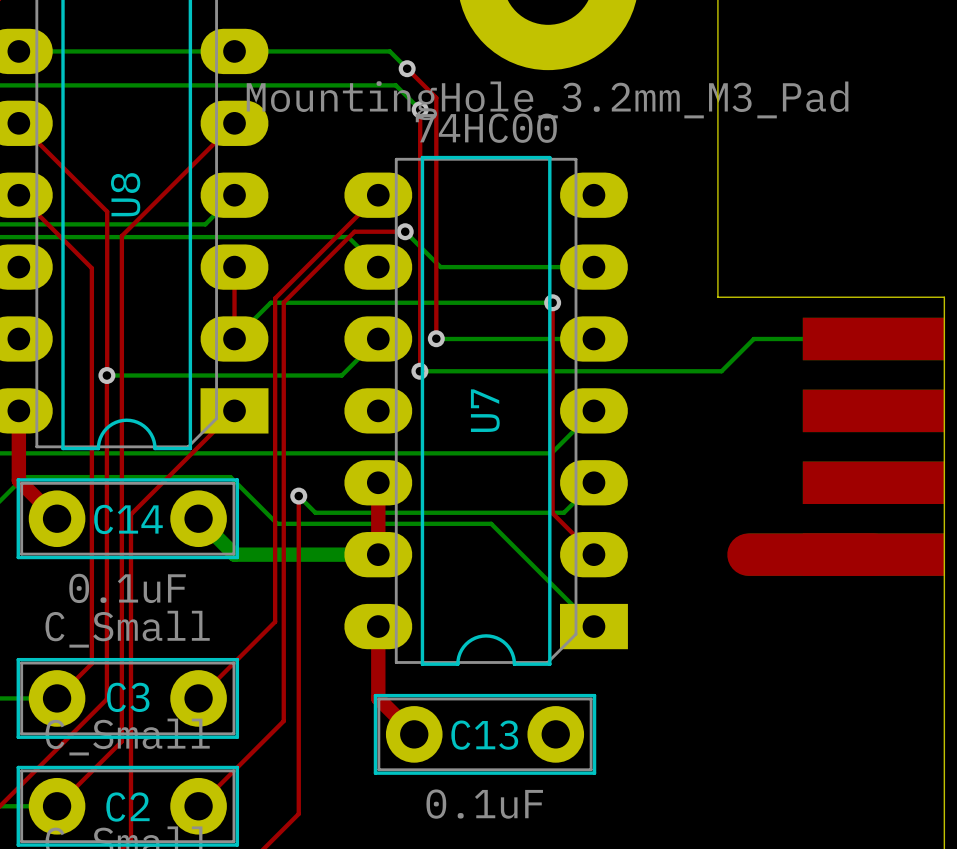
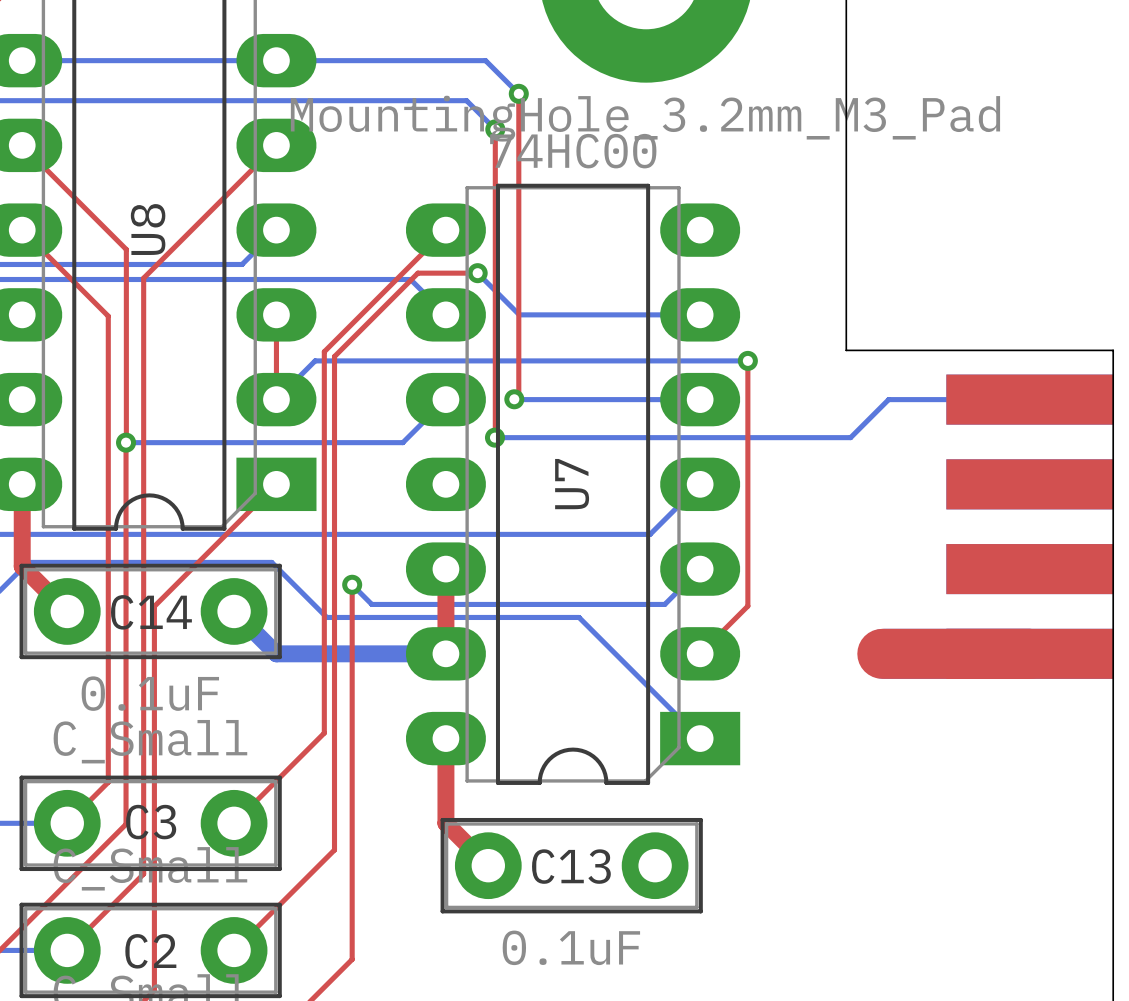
bottom track: (389, 51) (407, 68) -> (459, 60) (485, 60) (518, 93)
top track: (407, 68) (436, 97) (436, 338) -> none
via position: (407, 68) -> (518, 93)
top track: none -> (518, 93) (520, 399)
bottom track: (552, 302) (270, 302) (267, 306) -> (747, 360) (315, 360)
top track: (552, 302) (552, 513) (593, 554) -> (747, 360) (747, 606) (700, 653)
via position: (552, 302) -> (747, 360)

